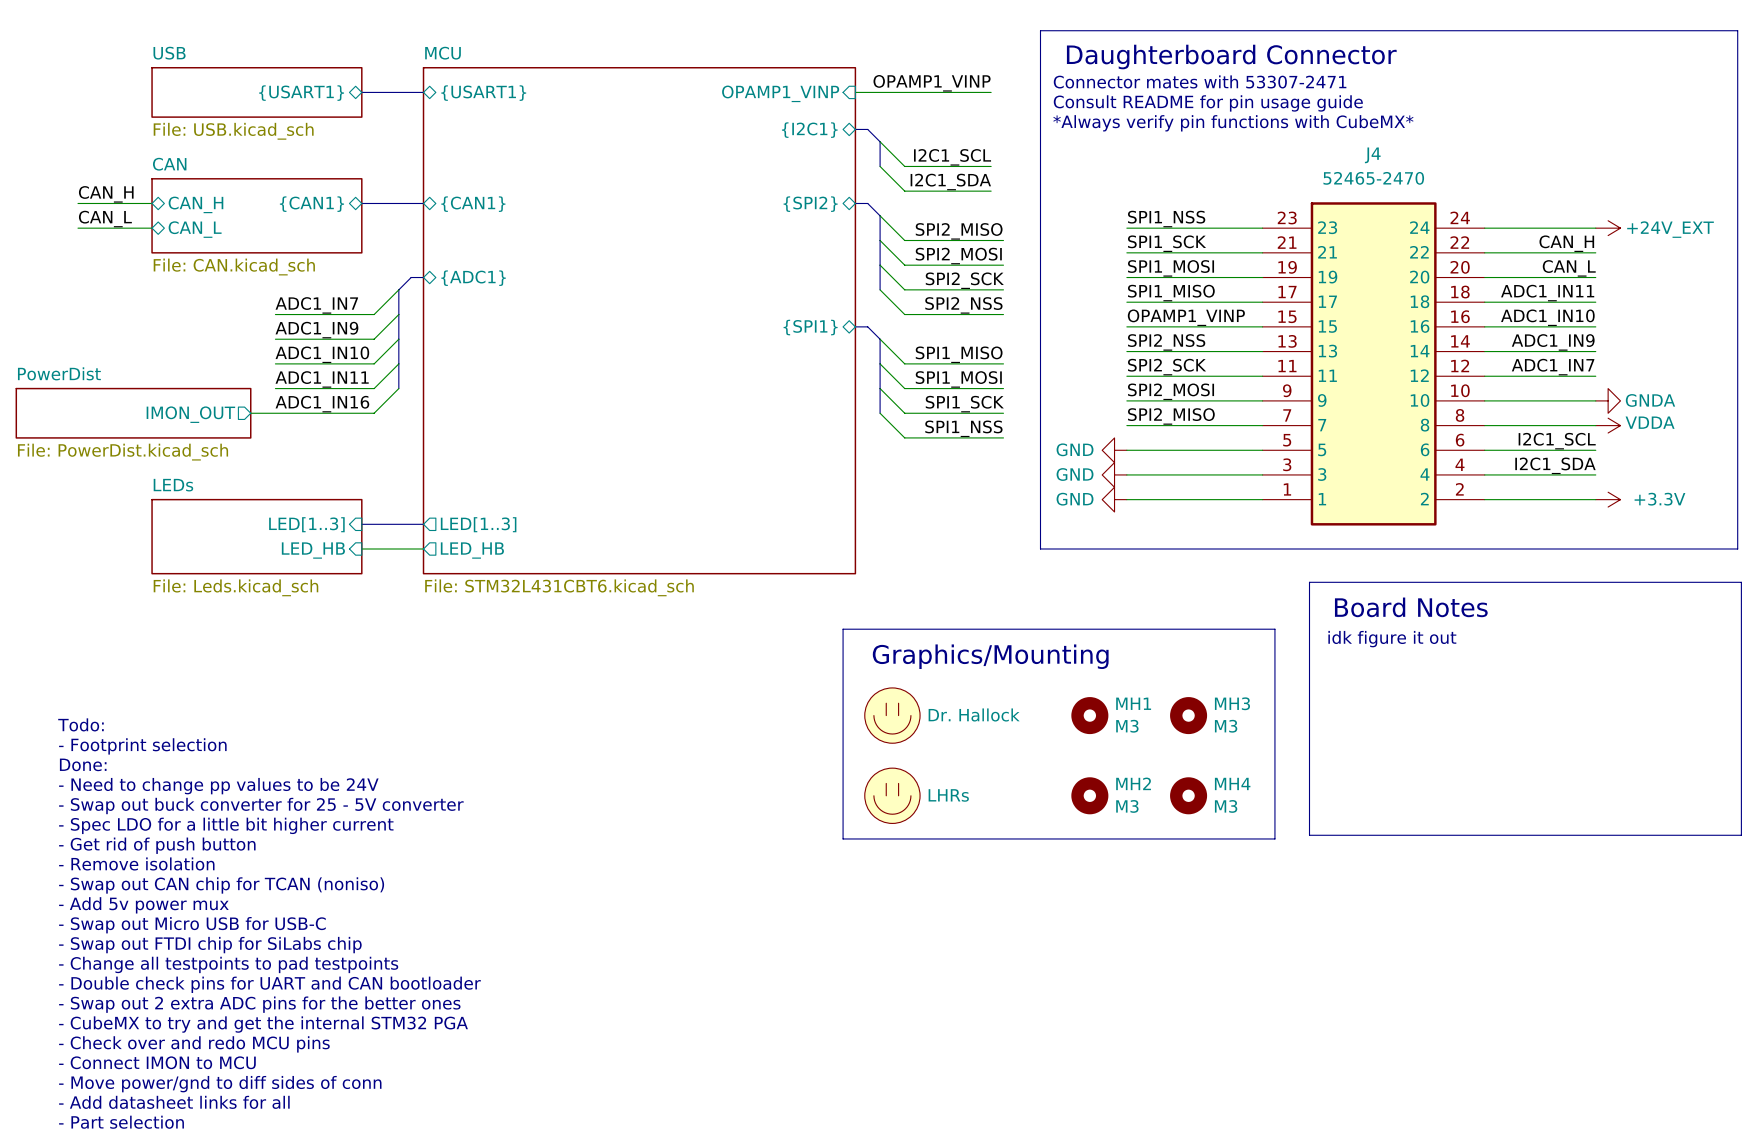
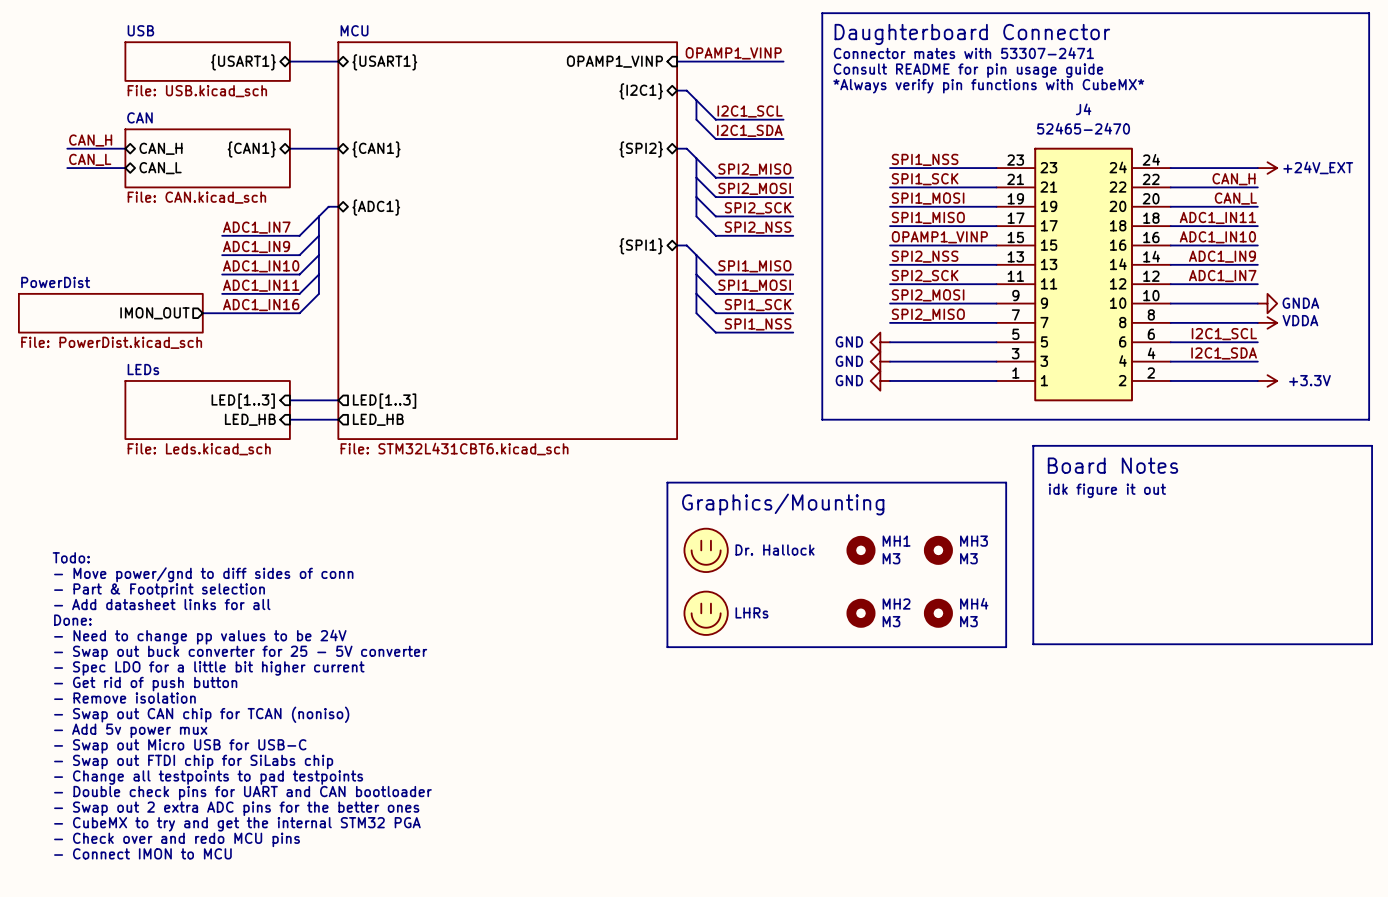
text: - Footprint selection (142, 746) -> - Move power/gnd to diff sides of conn (203, 574)
text: Done: (83, 764) -> - Part & Footprint selection (159, 590)
text: - Need to change pp values to be 24V (218, 786) -> - Add datasheet links for all (162, 604)
text: - Swap out buck converter for 25 - 5V converter (261, 806) -> Done: (72, 620)
text: - Spec LDO for a little bit higher current (226, 825) -> - Need to change pp values to be 24V (200, 637)
text: - Get rid of push button (157, 845) -> - Swap out buck converter for 25 - 5V converter (240, 652)
text: - Remove isolation (136, 863) -> - Spec LDO for a little bit higher current (209, 668)
text: - Swap out CAN chip for TCAN (noniso) (221, 885) -> - Get rid of push button (145, 684)
text: - Add 5v power mux (143, 905) -> - Remove isolation (124, 698)
text: - Swap out Micro USB for USB-C (192, 925) -> - Swap out CAN chip for TCAN (noniso) (201, 714)
text: - Swap out FTDI chip for SiLabs chip (210, 945) -> - Add 5v power mux (130, 730)
text: - Change all testpoints to pad testpoints (228, 964) -> - Swap out Micro USB for USB-C (180, 746)
text: - Double check pins for UART and CAN bootloader (269, 984) -> - Swap out FTDI chip for SiLabs chip (193, 761)
text: - Swap out 2 extra ADC pins for the better ones (259, 1004) -> - Change all testpoints to pad testpoints (208, 777)
text: - CubeMX to try and get the internal STM32 PGA (263, 1024) -> - Double check pins for UART and CAN bootloader (242, 793)
text: - Check over and redo MCU pins (194, 1044) -> - Swap out 2 extra ADC pins for the better ones (236, 808)
text: - Connect IMON to MCU (157, 1062) -> - CubeMX to try and get the internal STM32 PGA (237, 824)
text: - Move power/gnd to diff sides of conn (220, 1084) -> - Check over and redo MCU pins (177, 839)
text: - Add datasheet links for all (174, 1102) -> - Connect IMON to MCU (142, 853)
text: - Part selection (121, 1122) -> none

